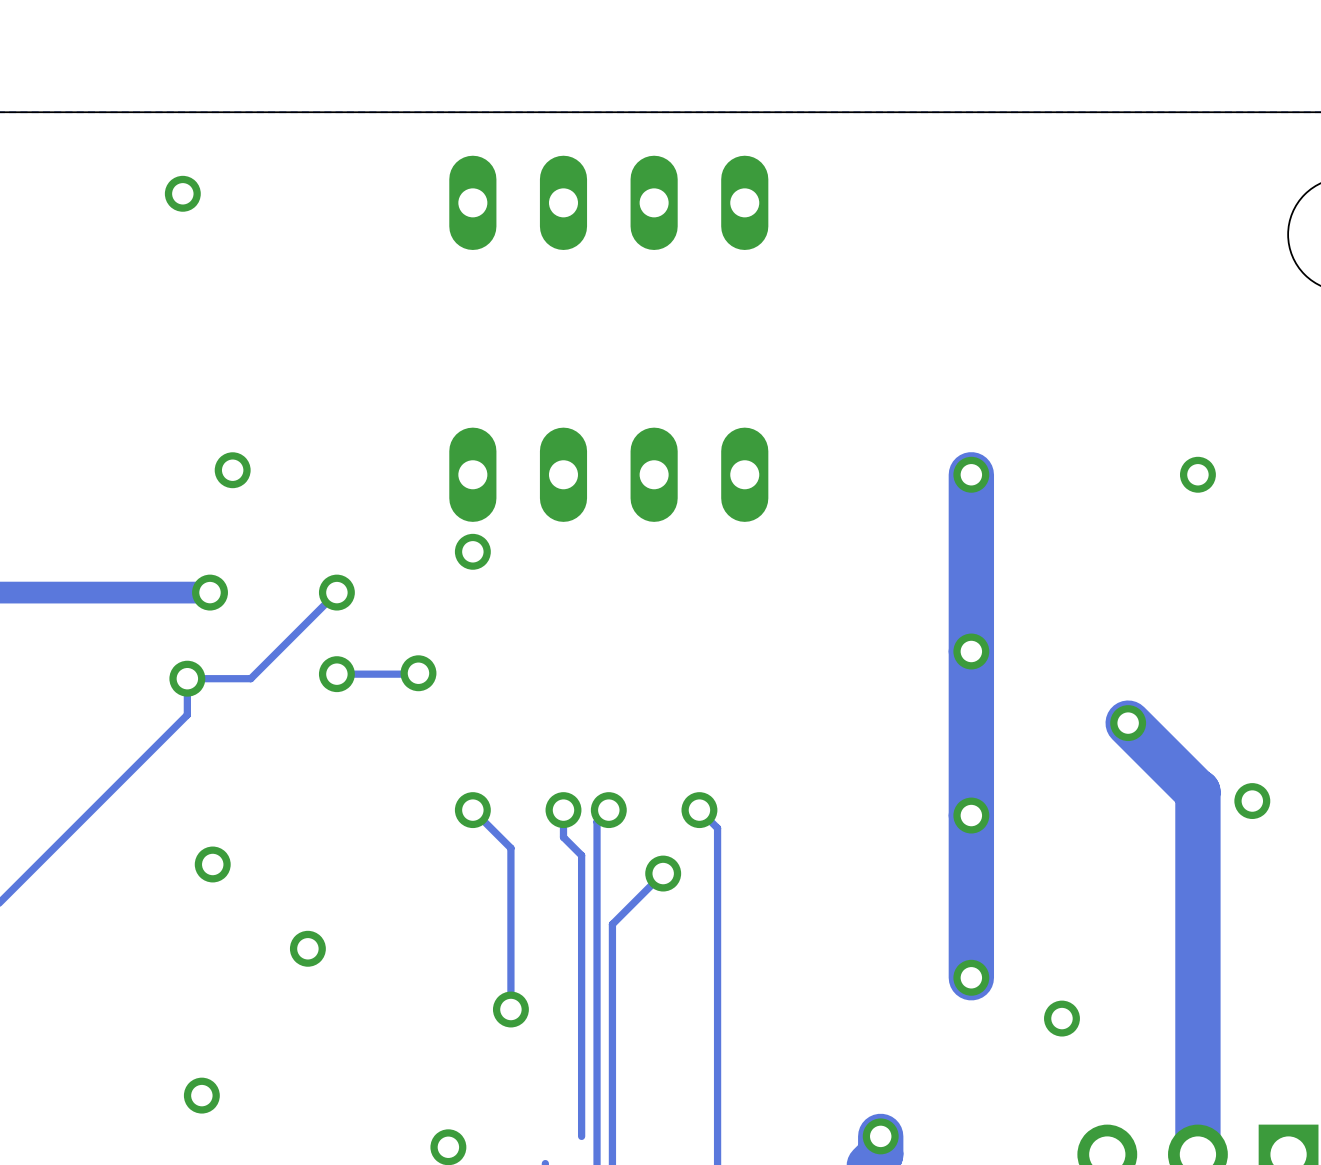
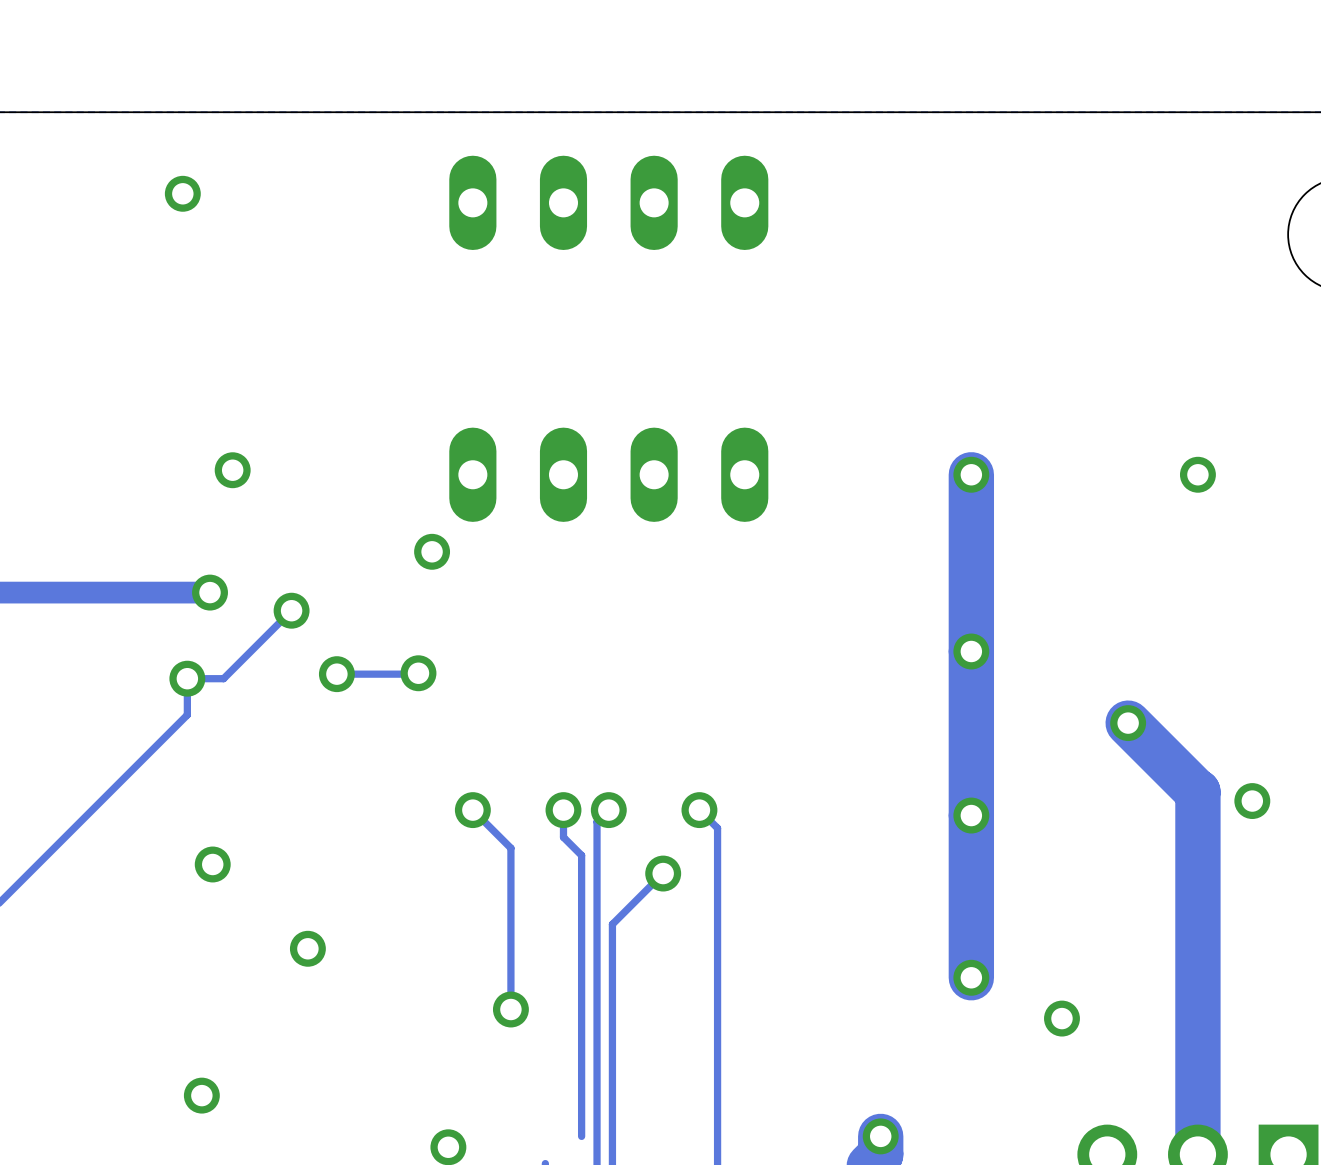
via position: (472, 551) -> (432, 551)
track: (336, 592) (250, 678) (223, 678) -> (291, 610) (223, 678)
via position: (336, 592) -> (291, 610)

